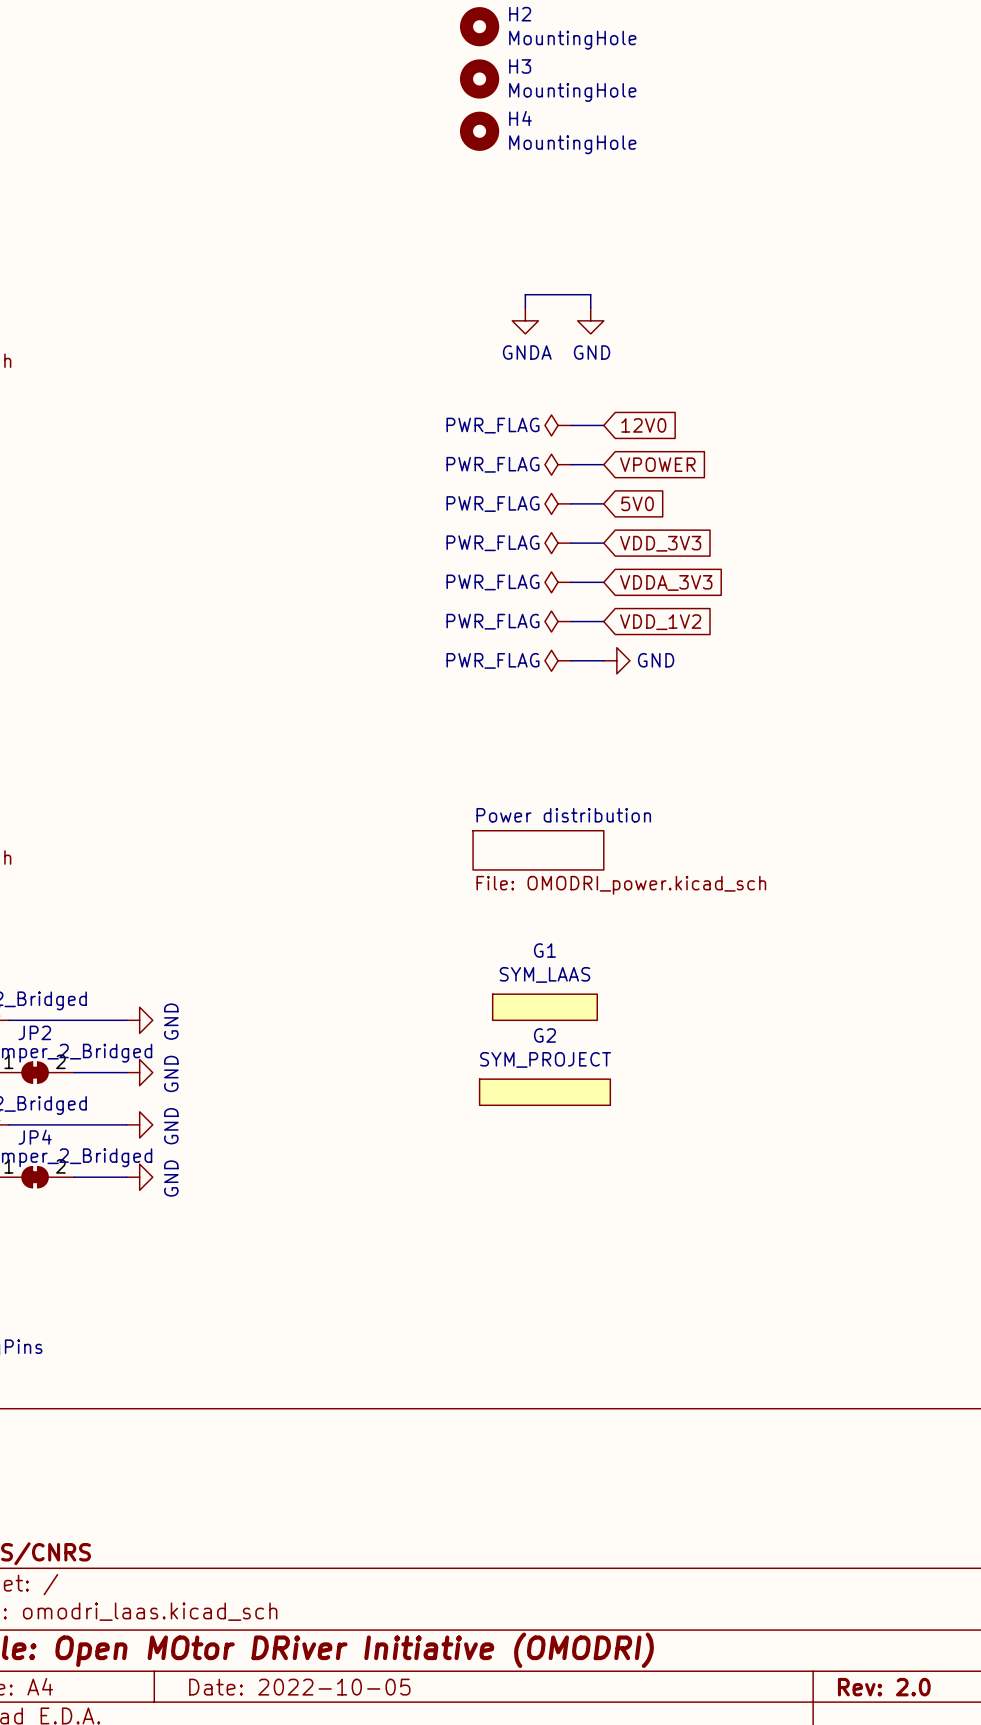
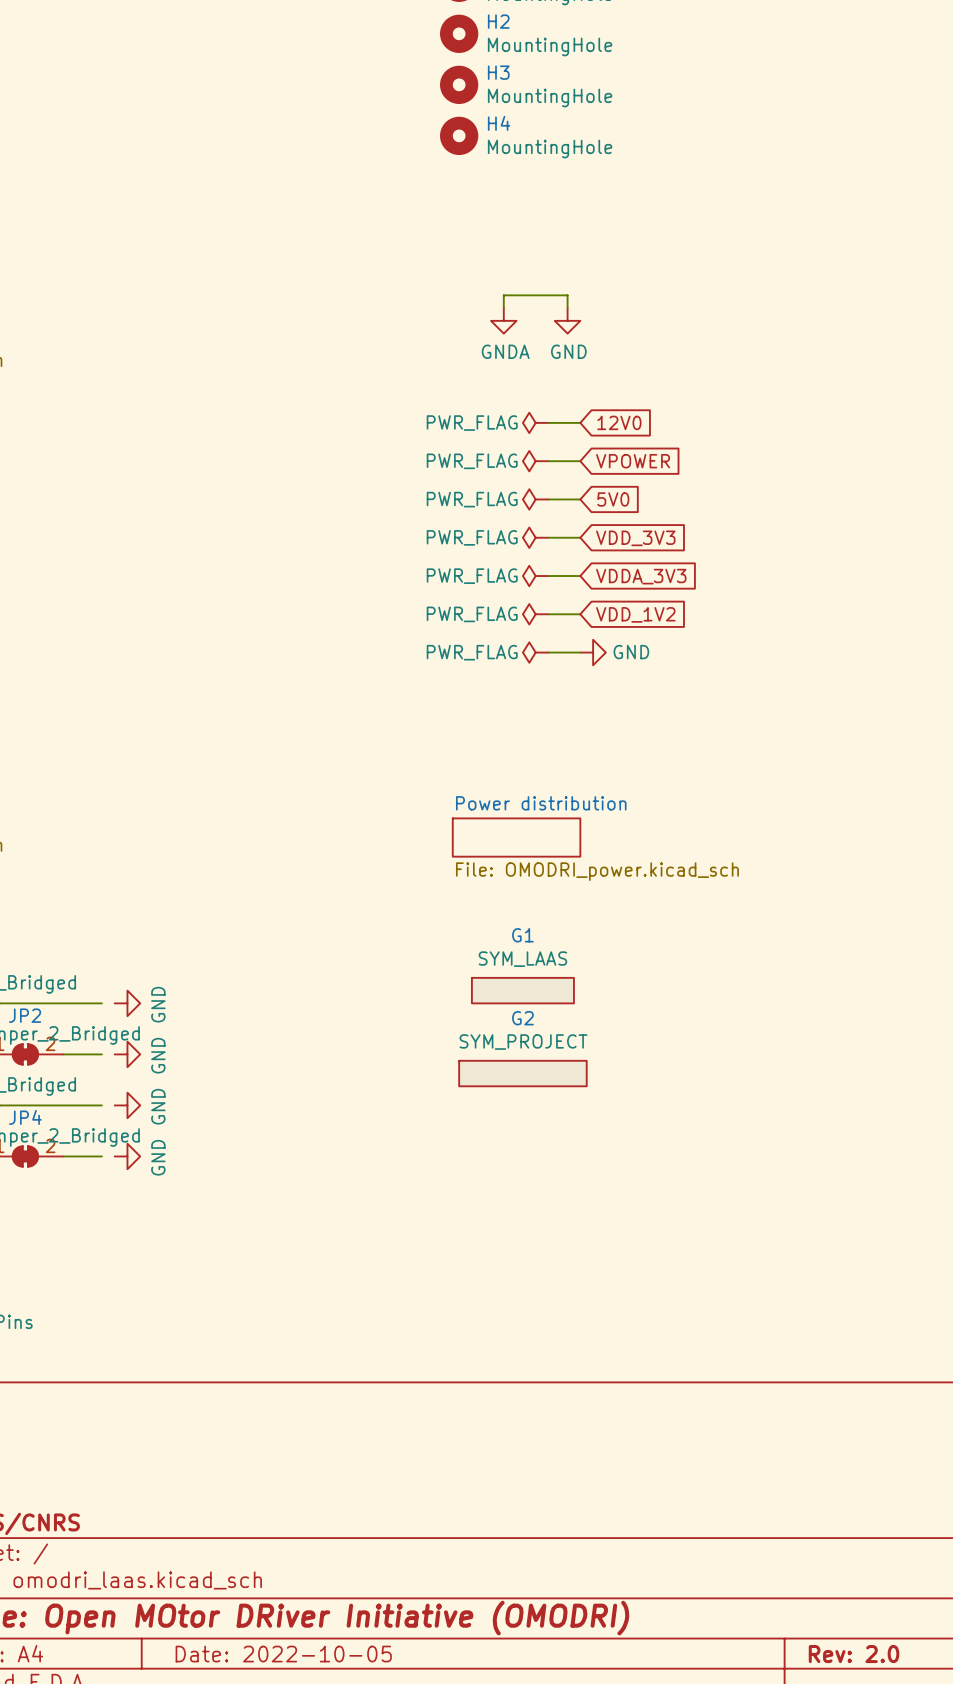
wire: (113, 1020) (126, 1020) -> none
wire: (113, 1072) (126, 1072) -> none
wire: (113, 1124) (126, 1124) -> none
wire: (113, 1177) (126, 1177) -> none

